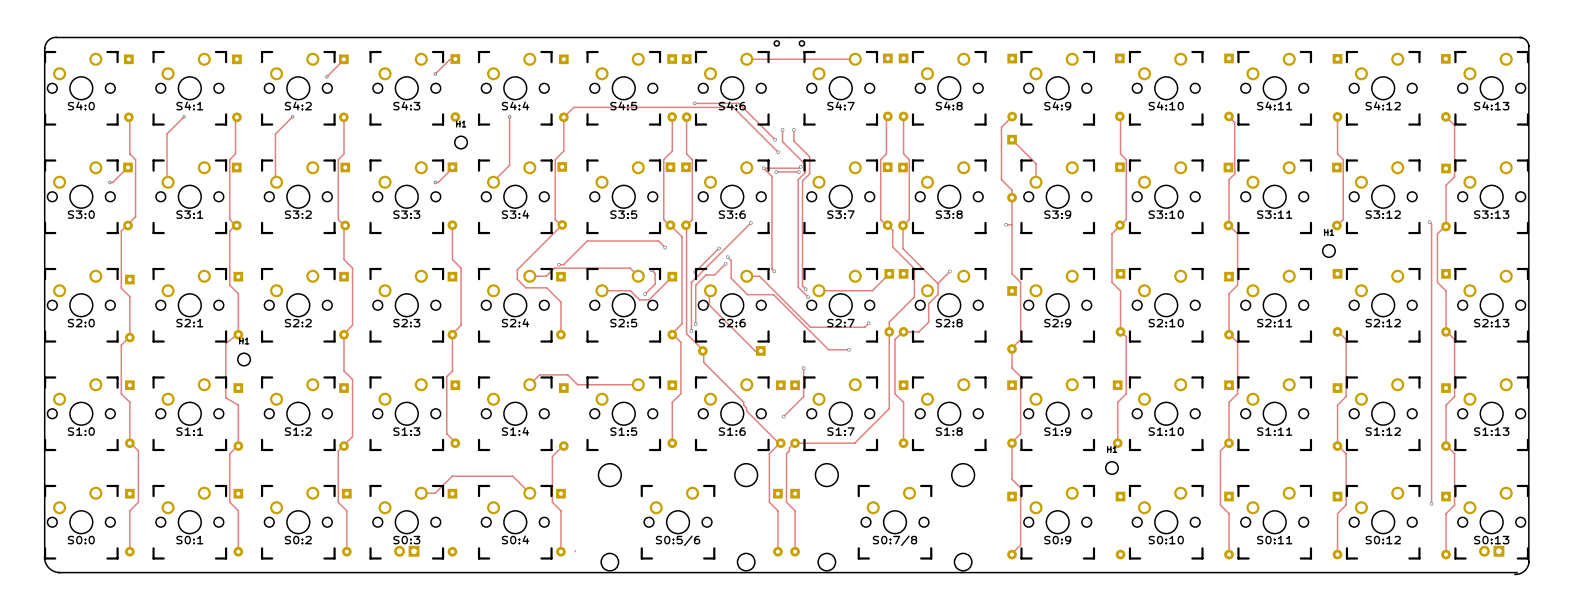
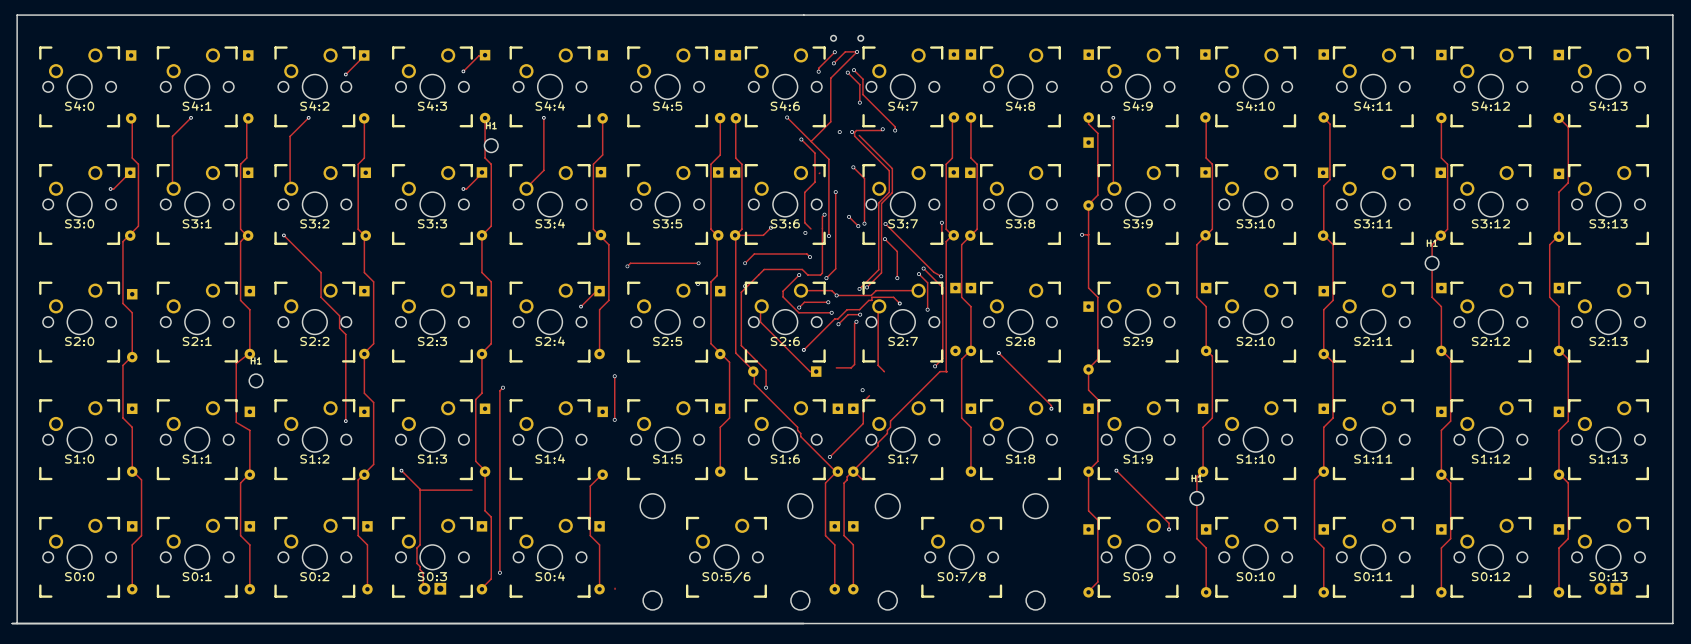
board edge: (56, 37) (48, 40) (44, 48) -> none
board edge: (56, 37) (1521, 37) -> none
board edge: (1519, 37) (1526, 40) (1528, 46) -> none
board edge: (1528, 45) (1528, 562) -> none
board edge: (44, 48) (44, 558) -> none
track: none -> (834, 52) (818, 68) (818, 71)
via: none -> (834, 52)
via: none -> (857, 51)
track: (746, 59) (855, 59) -> none
track: none -> (833, 63) (845, 51) (857, 51) (830, 78) (830, 121) (811, 141)
via: none -> (833, 63)
track: none -> (853, 70) (862, 79) (862, 94) (895, 126) (895, 130)
via: none -> (853, 70)
via: none -> (818, 71)
track: none -> (847, 72) (859, 84) (859, 102)
via: none -> (847, 72)
via: none -> (859, 102)
track: (694, 103) (738, 103) (775, 139) -> none
via: (694, 103) -> none
track: none -> (485, 117) (485, 158) (491, 164) (491, 226) (481, 235)
track: none -> (787, 117) (828, 159) (828, 236)
via: none -> (787, 117)
track: (1012, 116) (1001, 127) (1001, 179) (1012, 190) (1012, 196) -> (1088, 117) (1088, 124) (1097, 133) (1097, 195) (1088, 204)
track: none -> (1113, 117) (1113, 189)
via: none -> (1113, 117)
track: (563, 117) (573, 107) (733, 107) (778, 152) -> none
track: none -> (882, 129) (856, 130) (854, 132) (854, 136) (889, 170) (889, 192) (878, 202) (878, 269) (859, 288)
via: none -> (882, 129)
via: none -> (895, 130)
track: (782, 129) (782, 141) (805, 164) (805, 172) (798, 179) (798, 287) (808, 297) -> none
track: (793, 129) (793, 141) (809, 156) (809, 173) (802, 181) (802, 286) (805, 289) -> none
track: none -> (859, 135) (892, 168) (892, 192) (881, 203) (881, 272) (866, 287)
track: none -> (801, 139) (814, 153) (814, 182) (804, 192) (804, 222) (810, 228)
via: none -> (801, 139)
via: (775, 139) -> none
track: (1012, 139) (1035, 163) (1035, 182) -> none
via: (778, 152) -> none
track: none -> (853, 167) (864, 178) (864, 223)
via: none -> (853, 167)
track: (800, 166) (763, 168) (771, 176) (771, 269) (774, 271) -> none
via: (800, 166) -> none
via: (763, 168) -> none
track: (776, 171) (798, 172) -> none
via: (776, 171) -> none
via: (798, 172) -> none
track: none -> (835, 192) (835, 268) (826, 278)
via: none -> (835, 192)
track: none -> (824, 214) (822, 216) (822, 273) (820, 275) (807, 275) (802, 269) (764, 269) (741, 292) (741, 345) (766, 370) (766, 387)
via: none -> (824, 214)
track: none -> (849, 216) (858, 226)
via: none -> (849, 216)
track: none -> (941, 222) (941, 241)
via: none -> (941, 222)
via: none -> (864, 223)
track: none -> (885, 223) (933, 272) (941, 276)
via: none -> (885, 223)
via: none -> (858, 226)
track: none -> (771, 227) (763, 235) (735, 235)
via: none -> (771, 227)
track: (1429, 222) (1431, 224) (1431, 503) -> none
via: (1429, 222) -> none
track: (750, 223) (691, 282) (691, 330) -> none
track: (562, 224) (517, 269) (517, 279) (525, 287) (546, 287) (560, 302) -> (599, 235) (608, 244) (608, 300) (599, 309) (599, 318)
track: none -> (283, 235) (321, 272) (321, 297) (339, 315) (339, 328) (345, 334) (345, 421)
via: none -> (283, 235)
track: none -> (717, 235) (717, 275) (710, 281) (710, 343) (720, 353)
track: (670, 225) (682, 236) (682, 323) (672, 334) -> none
via: none -> (828, 236)
track: none -> (952, 235) (946, 241) (946, 371)
track: (887, 225) (892, 230) (892, 247) (914, 268) (914, 296) (889, 322) (889, 408) (854, 443) (795, 443) -> none
track: (902, 225) (902, 248) (938, 283) -> none
track: none -> (970, 235) (961, 244) (961, 297) (970, 306) (970, 349)
track: none -> (1441, 235) (1432, 244) (1432, 297) (1441, 306) (1441, 349)
track: none -> (884, 239) (897, 251) (897, 278)
via: none -> (884, 239)
track: none -> (810, 257) (806, 254) (754, 254) (745, 263)
via: none -> (810, 257)
track: (665, 247) (658, 241) (587, 241) (563, 264) (558, 264) -> none
via: (665, 247) -> none
track: (719, 248) (695, 272) -> none
via: (719, 248) -> none
track: none -> (698, 263) (630, 263) (627, 266)
via: none -> (698, 263)
via: none -> (745, 263)
via: none -> (627, 266)
track: none -> (923, 268) (942, 287) (942, 358) (935, 366)
via: none -> (923, 268)
track: (727, 257) (731, 260) (731, 278) (747, 294) (773, 294) (828, 349) (849, 349) -> none
via: (727, 257) -> none
track: none -> (799, 275) (783, 291) (783, 297) (798, 312) (831, 312)
via: none -> (799, 275)
track: none -> (918, 274) (927, 282) (927, 309)
via: none -> (918, 274)
track: (725, 263) (714, 274) (706, 274) (695, 285) (695, 324) -> none
via: (725, 263) -> none
via: none -> (941, 276)
via: (558, 264) -> none
via: none -> (826, 278)
via: none -> (897, 278)
track: (651, 270) (655, 273) (655, 284) (645, 294) -> none
via: (774, 271) -> none
track: (949, 271) (938, 283) (938, 294) (928, 303) (928, 322) (918, 331) (903, 331) -> none
via: (949, 271) -> none
via: none -> (866, 287)
track: (889, 273) (872, 290) (819, 290) -> (884, 371) (878, 365) (879, 306)
via: none -> (859, 288)
track: (529, 276) (546, 276) (554, 268) (630, 268) (638, 276) -> none
track: none -> (599, 291) (596, 291) (581, 306)
track: (672, 276) (649, 299) (639, 299) (630, 290) (602, 290) -> none
track: (759, 276) (810, 327) (864, 327) (868, 323) -> (814, 290) (831, 290) (836, 295) (871, 295) (876, 290) (918, 290)
via: none -> (836, 295)
track: none -> (828, 302) (804, 302) (799, 307)
via: none -> (828, 302)
track: none -> (899, 303) (893, 297) (871, 297) (871, 300) (868, 300) (859, 309) (847, 309) (837, 318) (834, 318) (803, 349)
via: none -> (899, 303)
via: (805, 289) -> none
via: none -> (581, 306)
via: none -> (799, 307)
via: none -> (927, 309)
via: (645, 294) -> none
via: none -> (831, 312)
via: (808, 297) -> none
track: none -> (860, 314) (848, 314) (838, 324)
via: none -> (860, 314)
track: none -> (856, 321) (854, 323) (854, 364) (851, 367) (836, 367)
via: none -> (856, 321)
via: none -> (838, 324)
via: (868, 323) -> none
via: (695, 324) -> none
via: (691, 330) -> none
via: none -> (803, 349)
track: none -> (998, 353) (1051, 405) (1051, 408)
via: none -> (998, 353)
via: none -> (935, 366)
via: (849, 349) -> none
track: none -> (946, 371) (947, 371)
track: none -> (946, 371) (940, 371) (890, 421) (890, 427) (887, 433) (878, 442) (878, 445) (853, 470) (862, 479)
track: none -> (614, 376) (614, 419)
via: none -> (614, 376)
track: none -> (503, 387) (499, 390) (499, 572)
via: none -> (503, 387)
via: none -> (766, 387)
track: (803, 368) (803, 396) (783, 416) -> none
track: none -> (869, 395) (863, 401) (863, 423) (829, 457)
track: (529, 384) (539, 374) (567, 374) (577, 384) (638, 384) -> none
via: none -> (1051, 408)
via: none -> (614, 419)
via: none -> (345, 421)
via position: (783, 416) -> (829, 457)
track: none -> (401, 470) (420, 489) (420, 544) (416, 548) (416, 563) (423, 572) (423, 588)
via: none -> (401, 470)
track: none -> (485, 470) (485, 510) (491, 517) (491, 578) (481, 588)
track: none -> (1116, 470) (1169, 523) (1169, 529)
via: none -> (1116, 470)
track: none -> (1203, 470) (1196, 476) (1196, 538) (1206, 548) (1206, 591)
track: none -> (420, 490) (472, 490)
track: (421, 493) (435, 493) (452, 476) (512, 476) (529, 493) -> none
via: none -> (1169, 529)
via: (1431, 503) -> none
via: none -> (499, 572)
board edge: (44, 557) (49, 568) (60, 572) -> none
board edge: (1529, 561) (1524, 570) (1514, 574) -> none
board edge: (58, 572) (1517, 572) -> none
board edge: none -> (12, 623) (1672, 623) (1672, 15) (17, 15) (17, 623)

